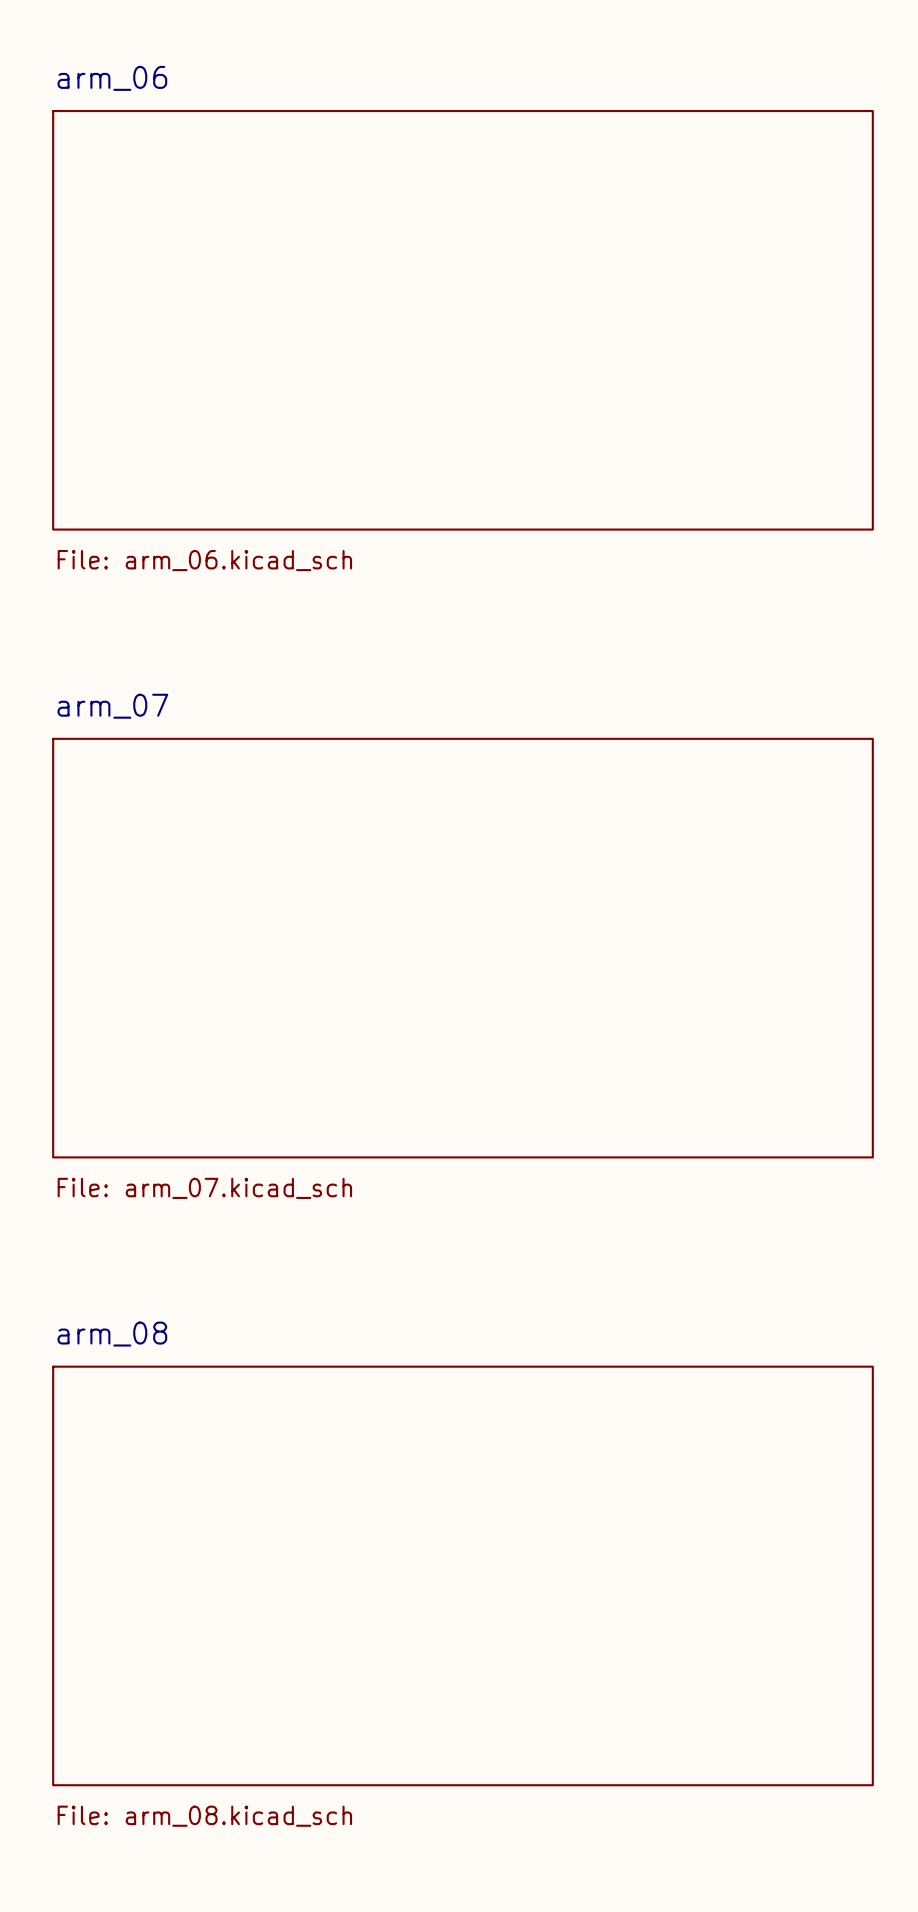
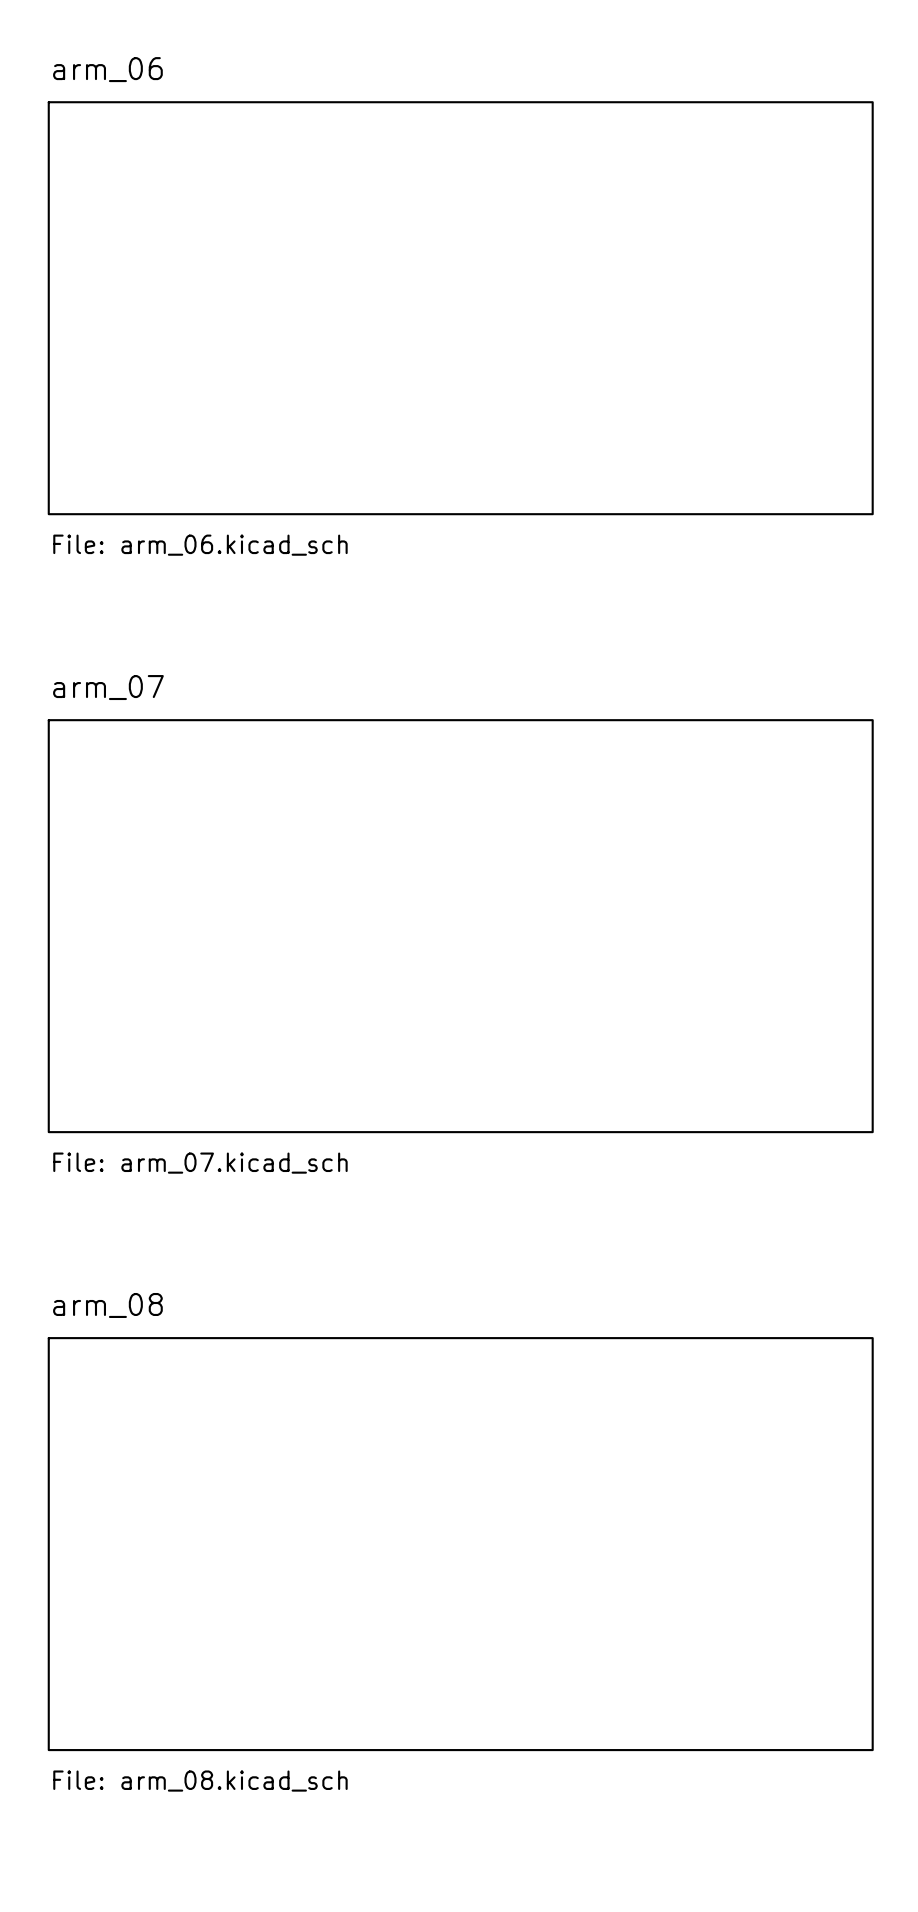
sheet arm_06 shape: [52, 109, 874, 531] -> [47, 101, 874, 516]
sheet arm_07 shape: [52, 737, 874, 1159] -> [47, 719, 874, 1134]
sheet arm_08 shape: [52, 1365, 874, 1787] -> [47, 1337, 874, 1752]

